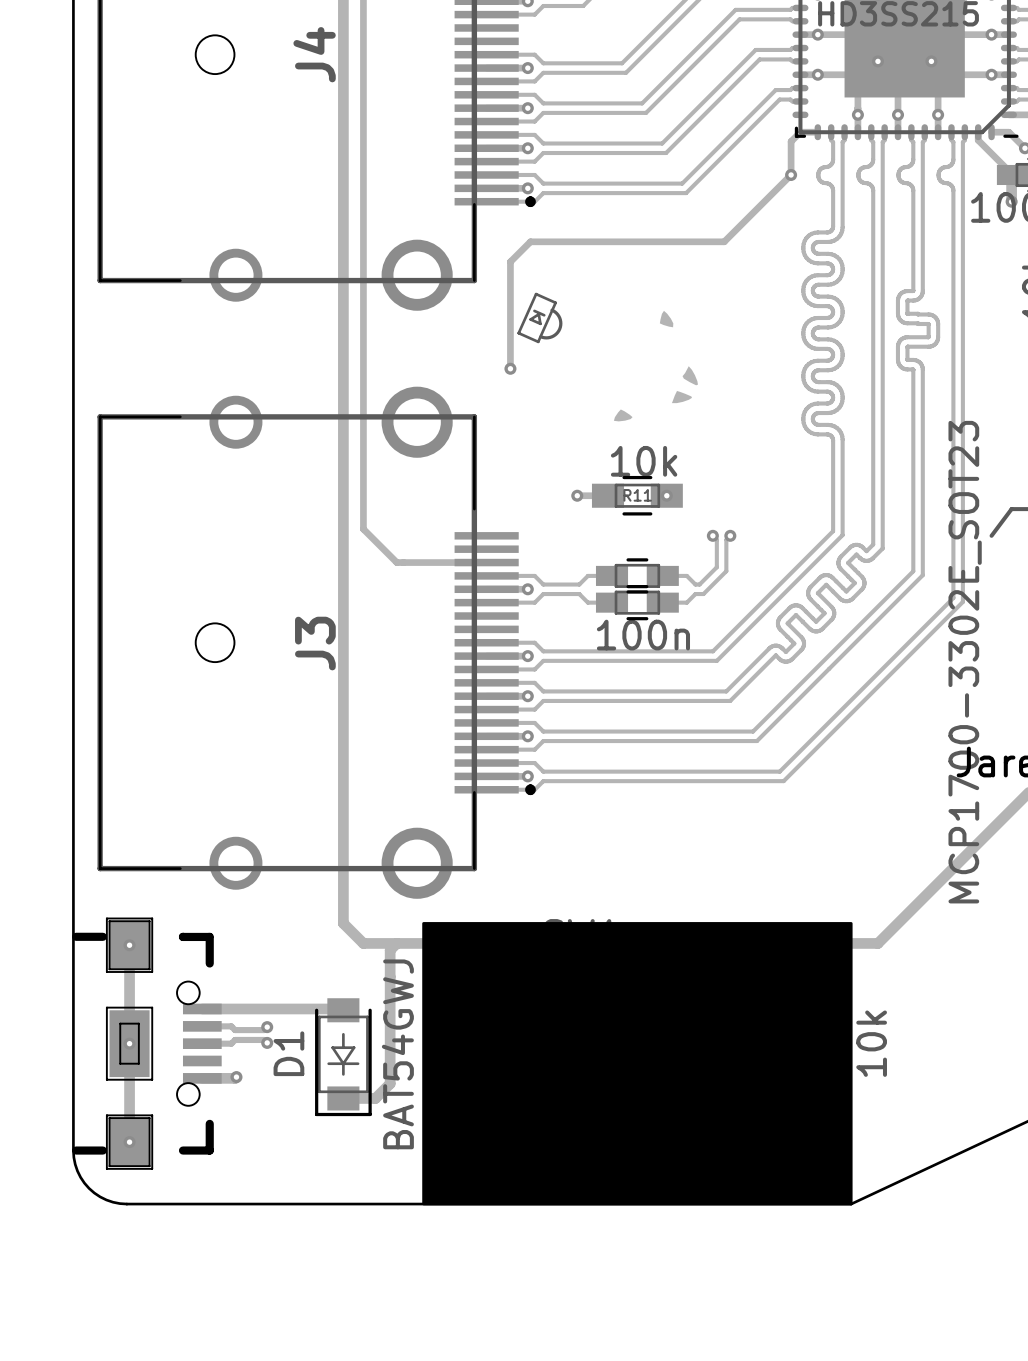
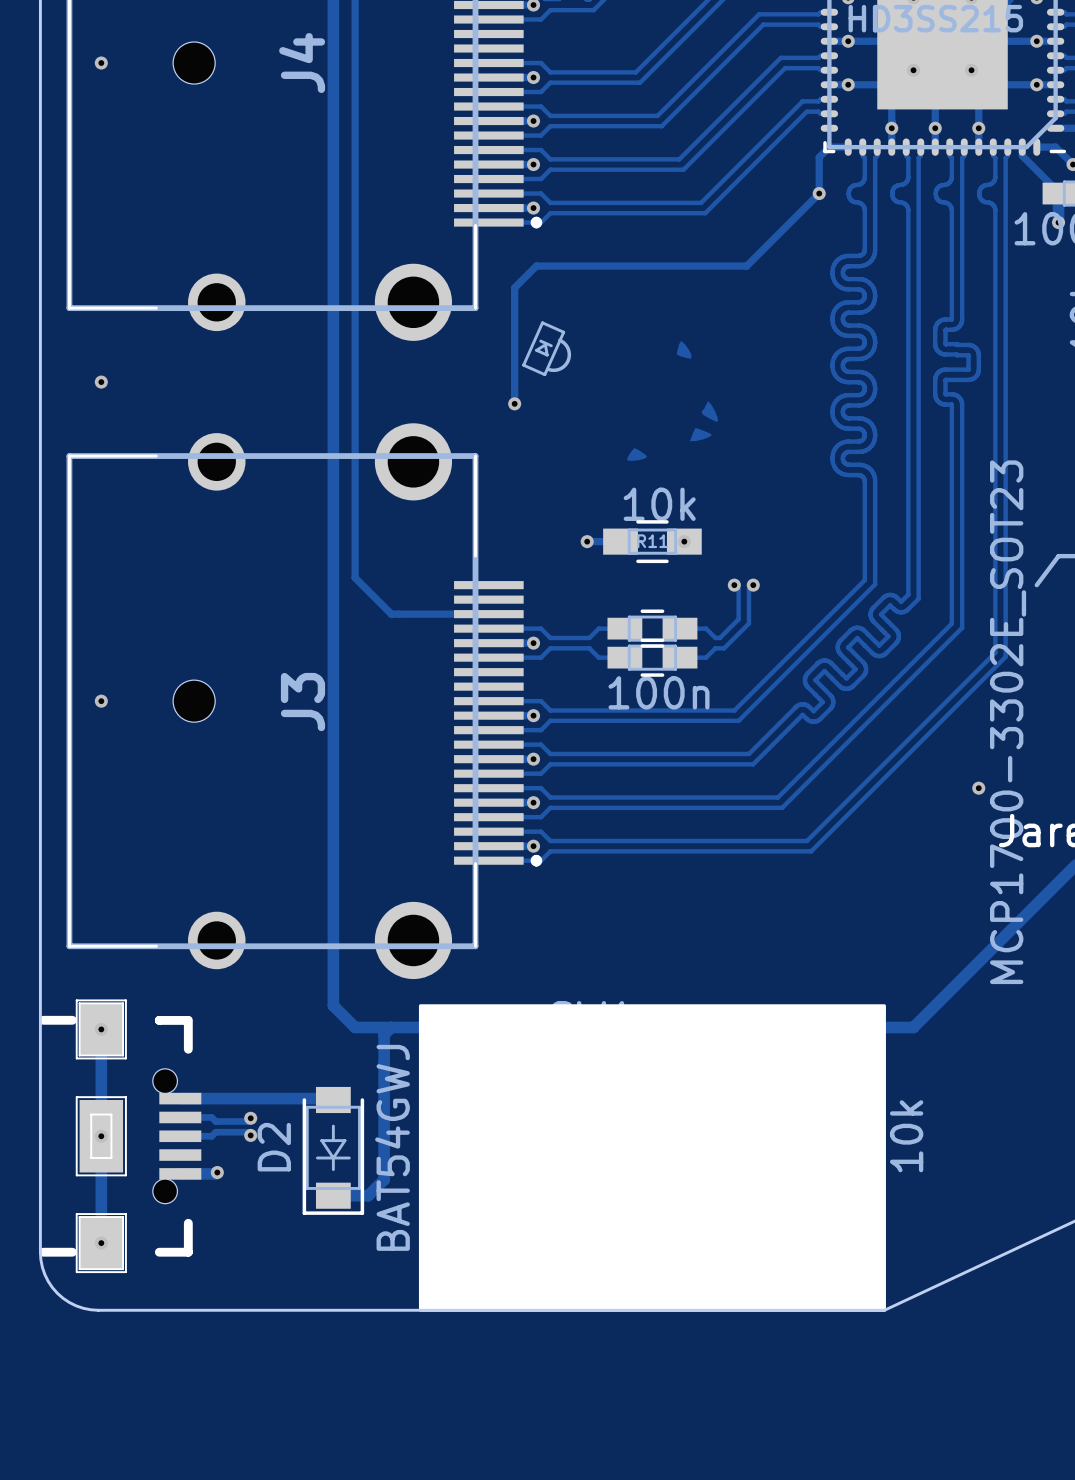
via: none -> (101, 63)
via: none -> (101, 382)
via: none -> (101, 701)
via: none -> (978, 788)
D1 name: D1 (288, 1053) -> D2 (274, 1147)

